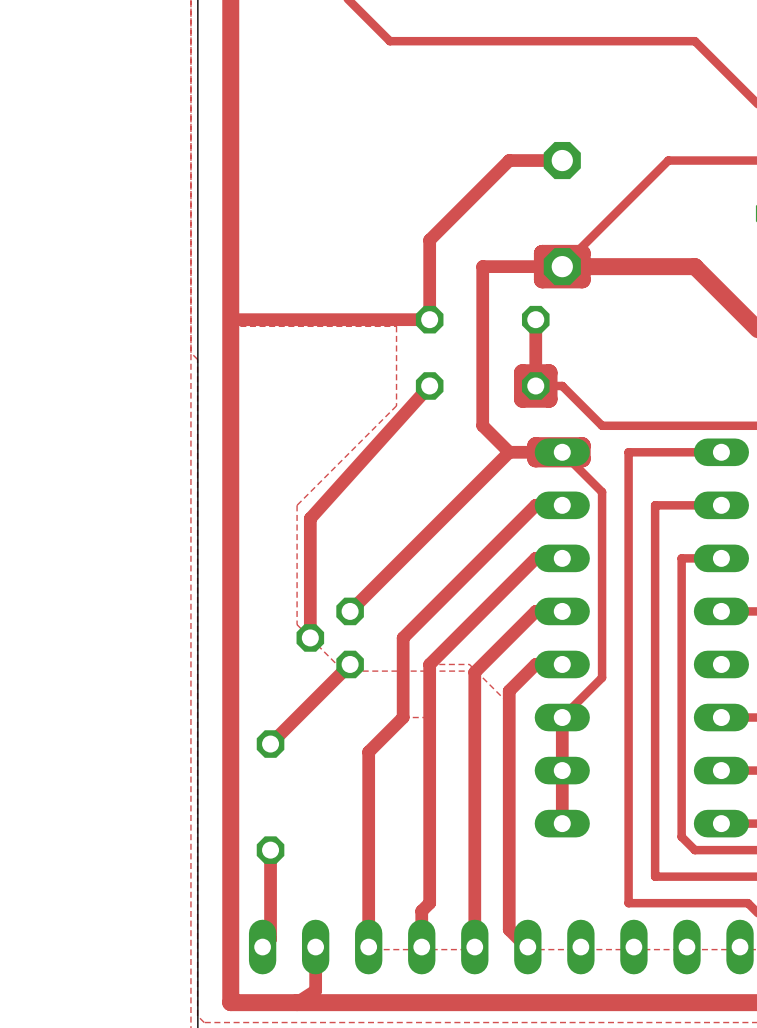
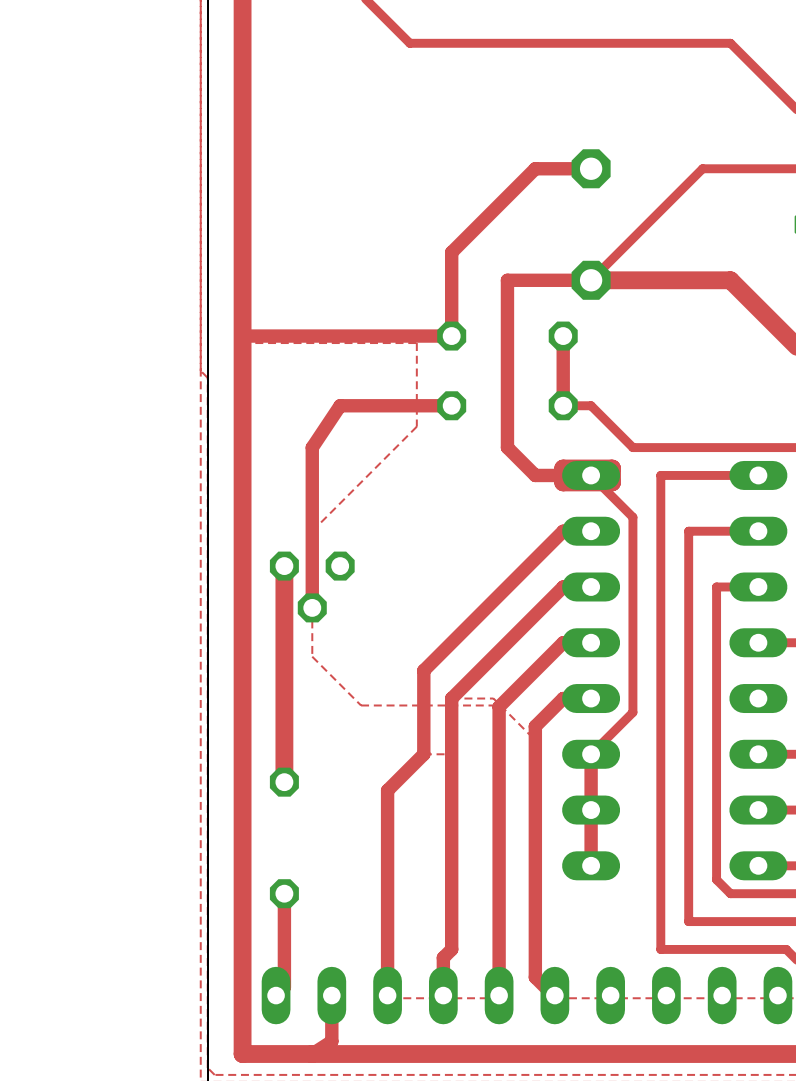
top track: (582, 253) (582, 279) (542, 279) (542, 253) (582, 253) -> none
top track: (549, 372) (522, 372) (522, 399) (549, 399) (549, 372) -> none
top track: (429, 385) (310, 518) (310, 637) -> (451, 405) (340, 405) (312, 447) (312, 607)
top track: (509, 452) (350, 611) -> none
part rotation: 0° (330, 637) -> 90° counterclockwise (312, 586)
part position: (330, 637) -> (312, 586)
top track: (350, 664) (270, 744) -> (284, 566) (284, 782)

